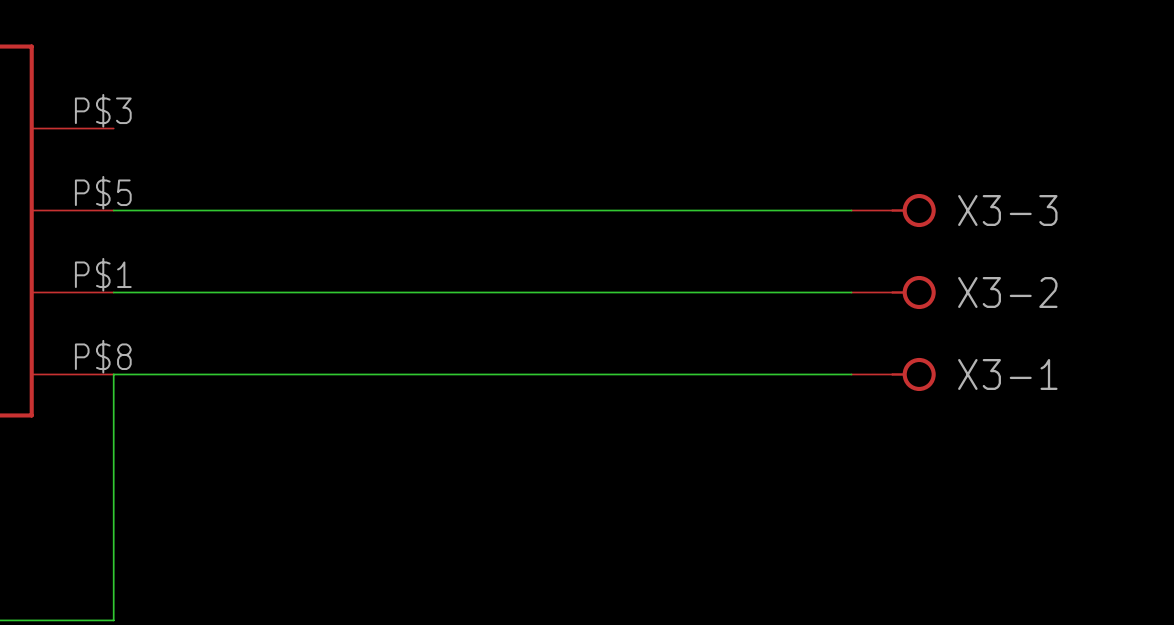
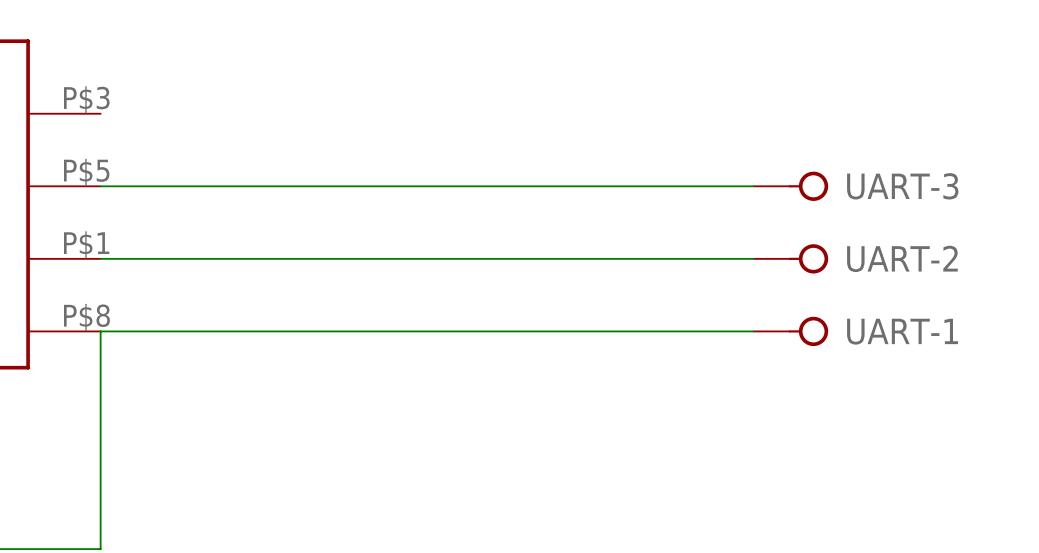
X3-3 name: X3-3 (1007, 210) -> UART-3 (902, 186)
X3-2 name: X3-2 (1007, 292) -> UART-2 (902, 258)
X3-1 name: X3-1 (1007, 374) -> UART-1 (902, 331)

